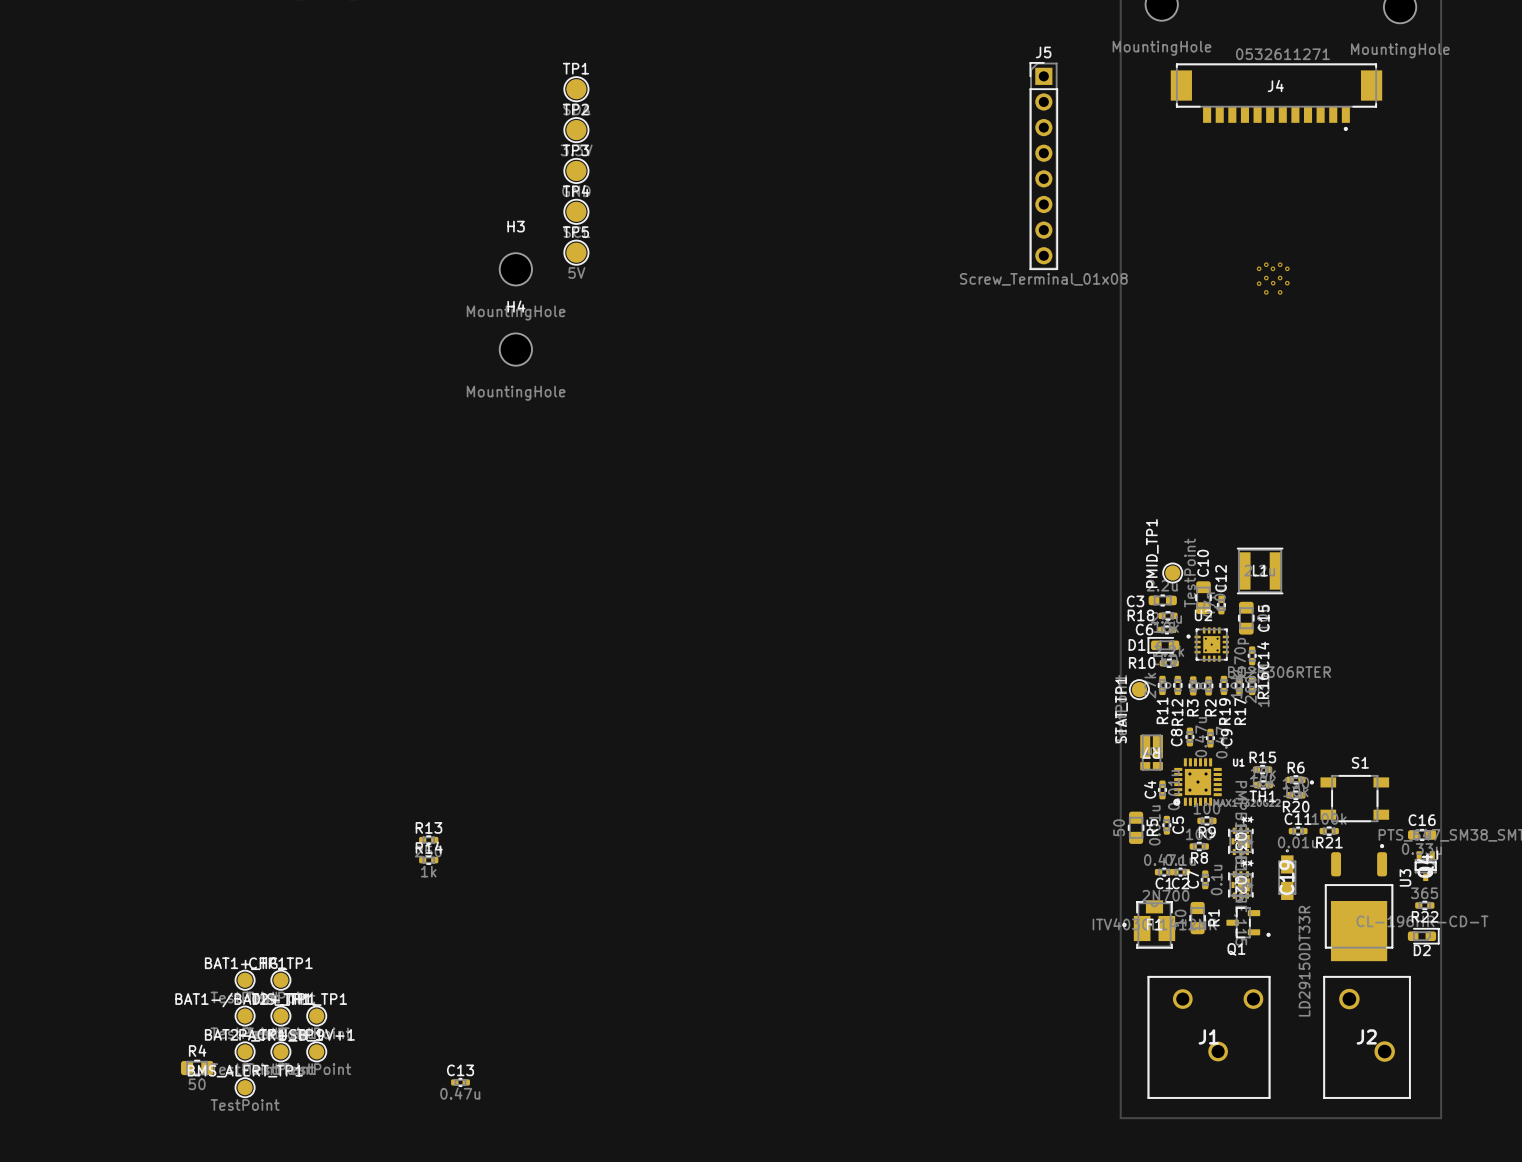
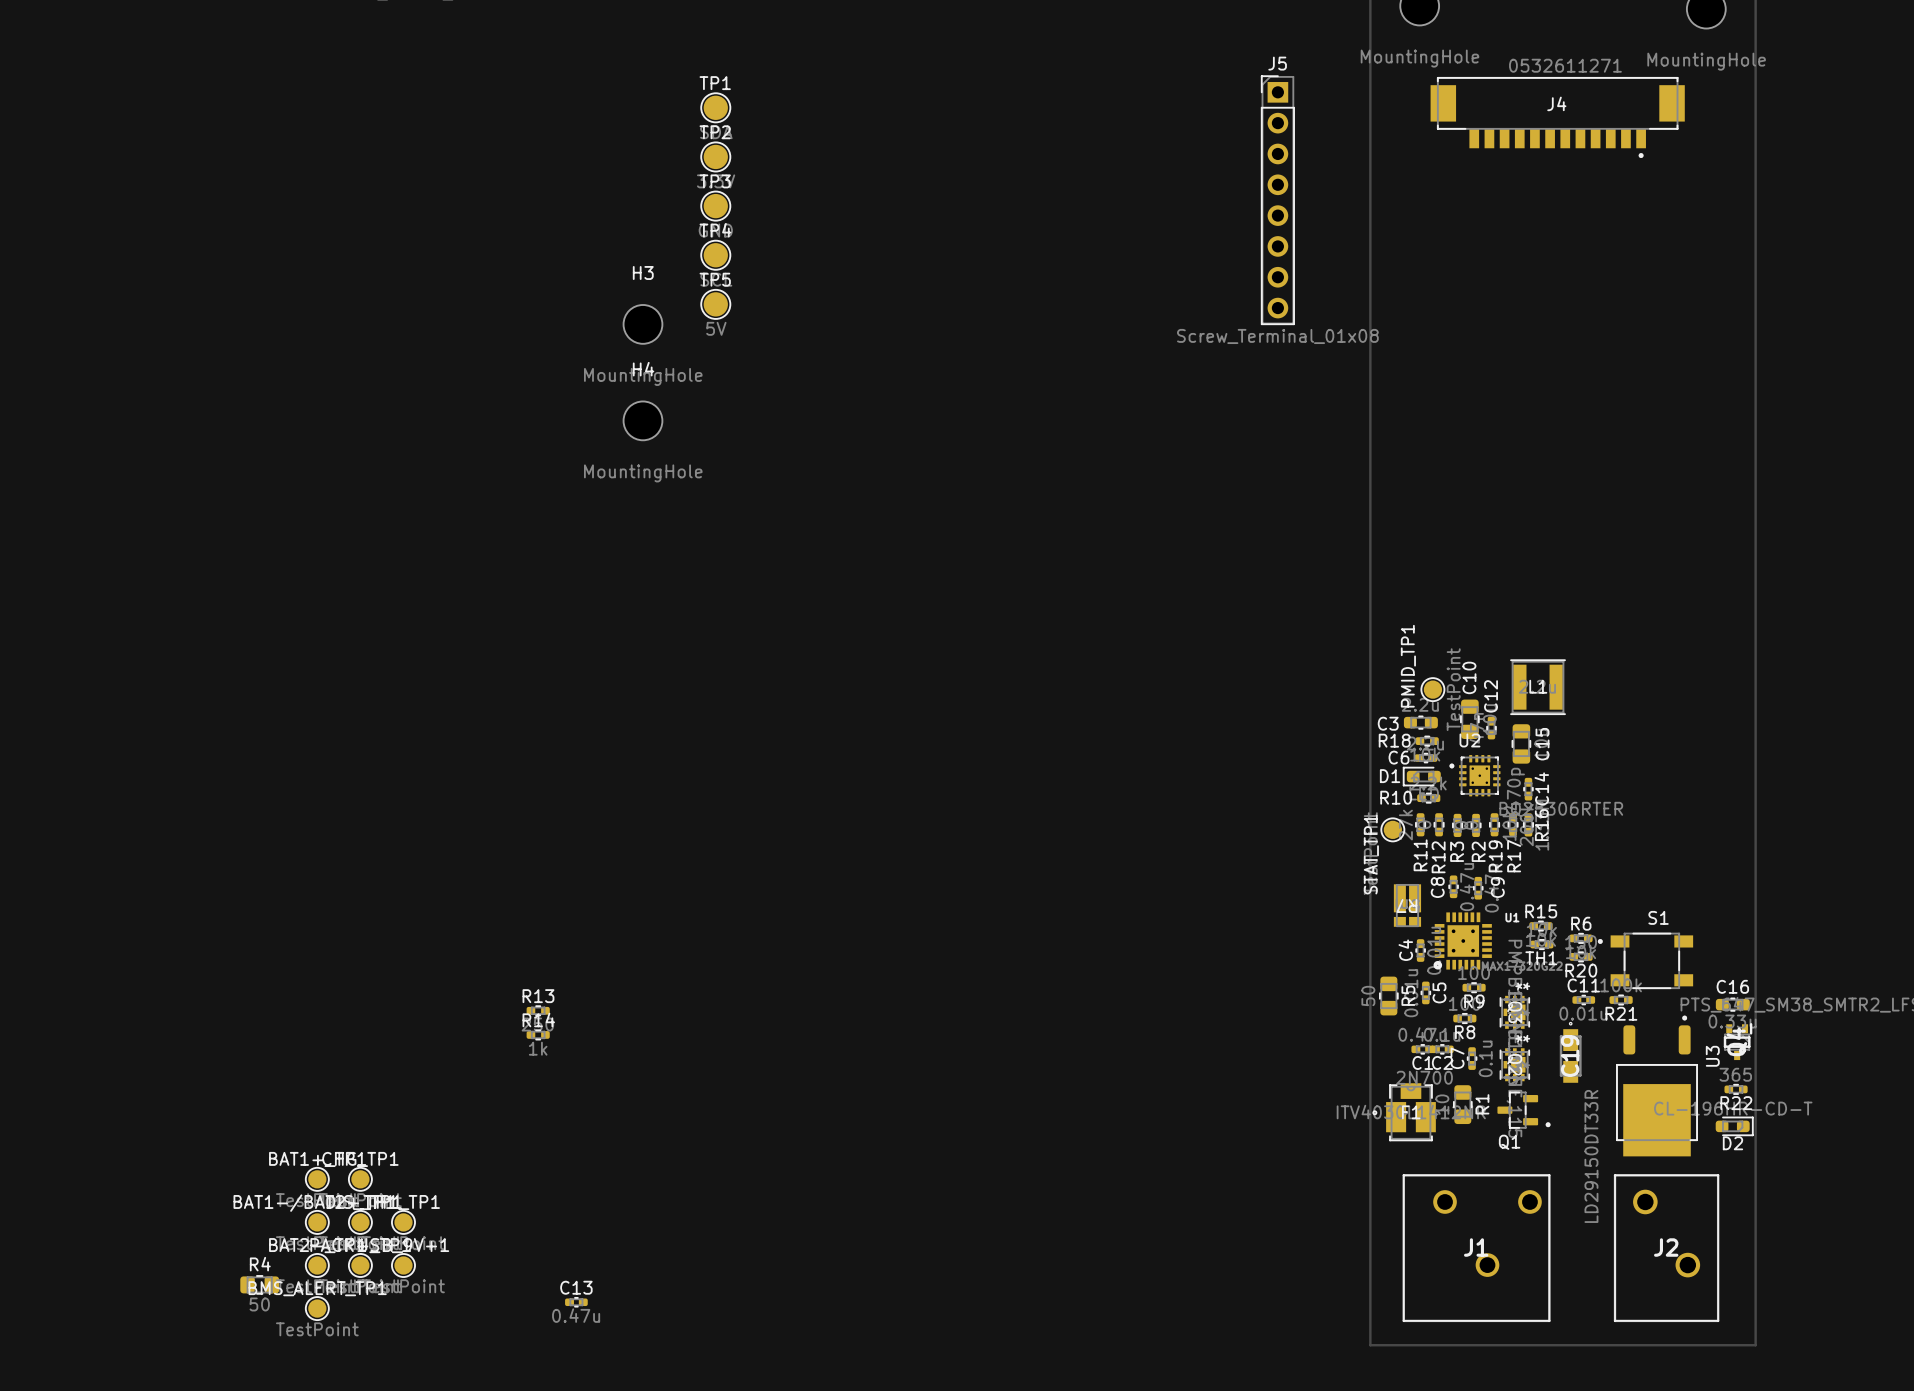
via: (1266, 264) -> none
via: (1280, 264) -> none
via: (1259, 268) -> none
via: (1272, 268) -> none
via: (1287, 268) -> none
via: (1266, 278) -> none
via: (1280, 278) -> none
via: (1259, 283) -> none
via: (1273, 283) -> none
via: (1287, 283) -> none
via: (1266, 292) -> none
via: (1280, 292) -> none

